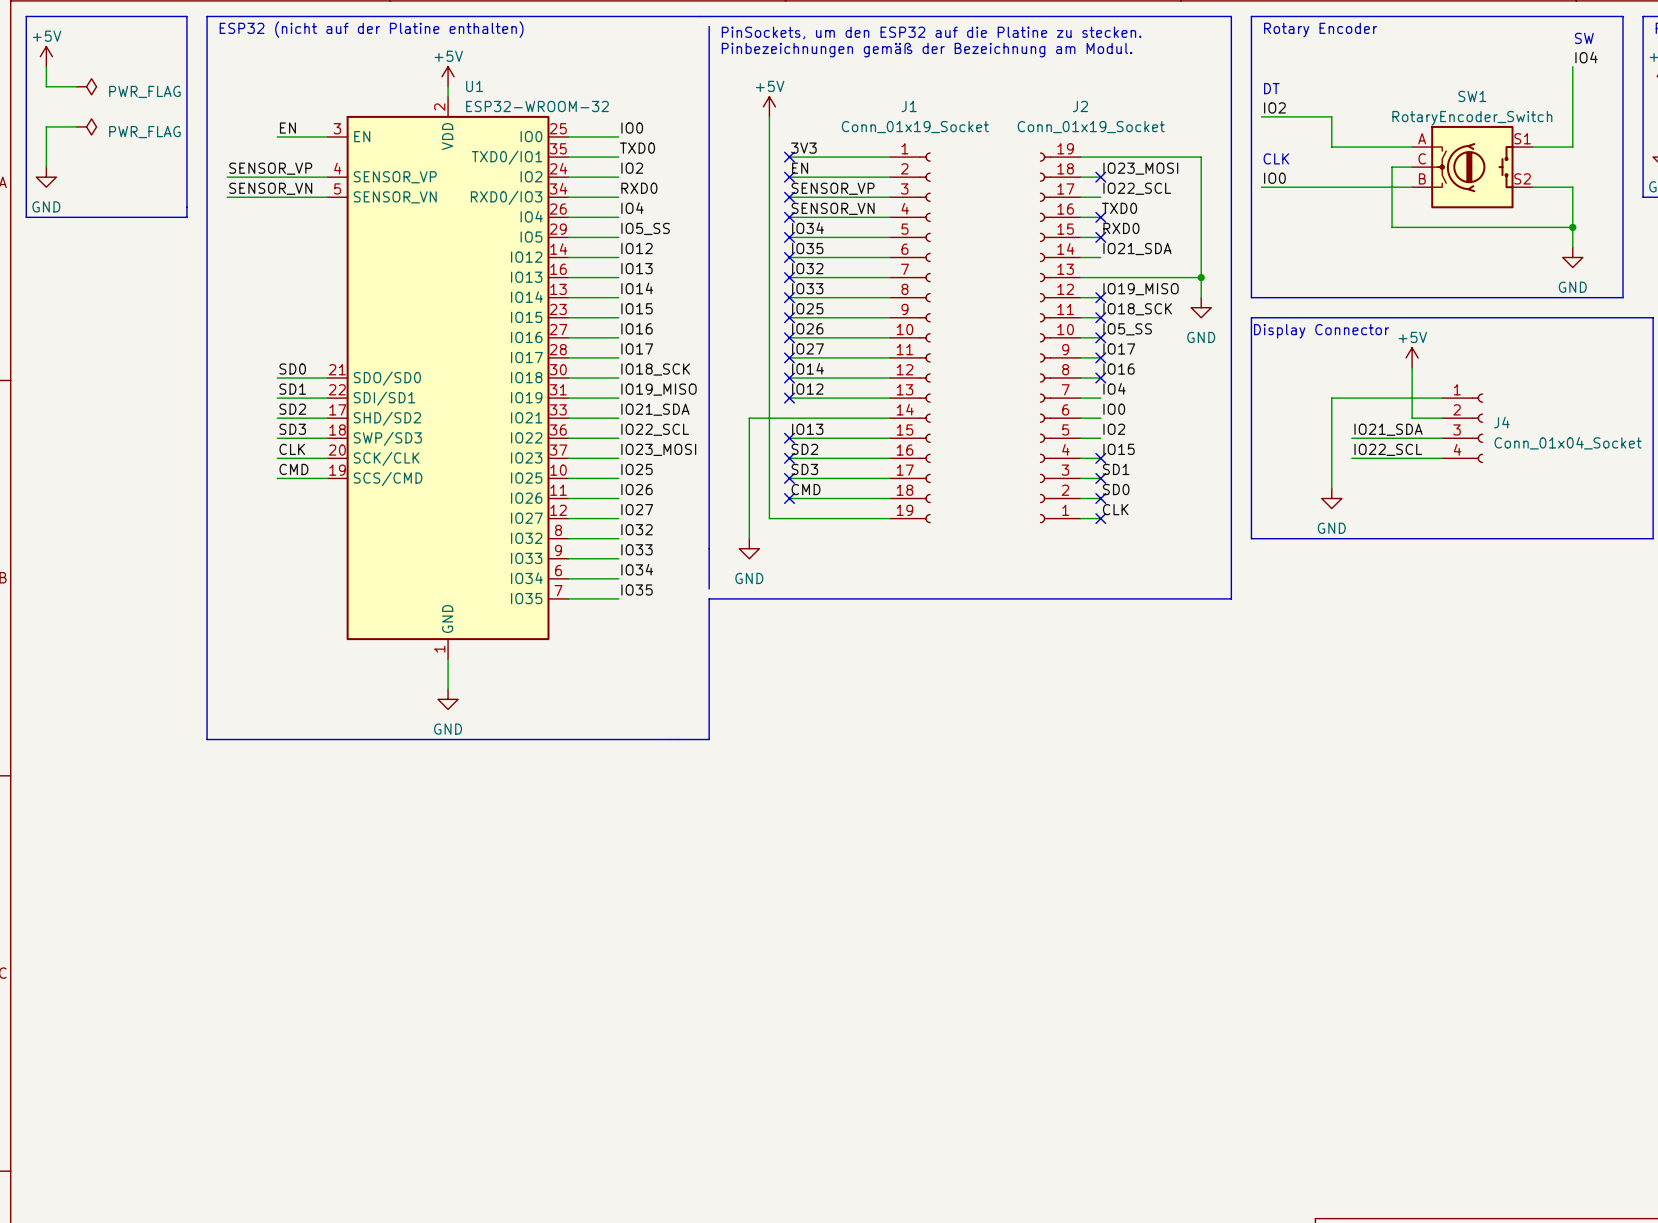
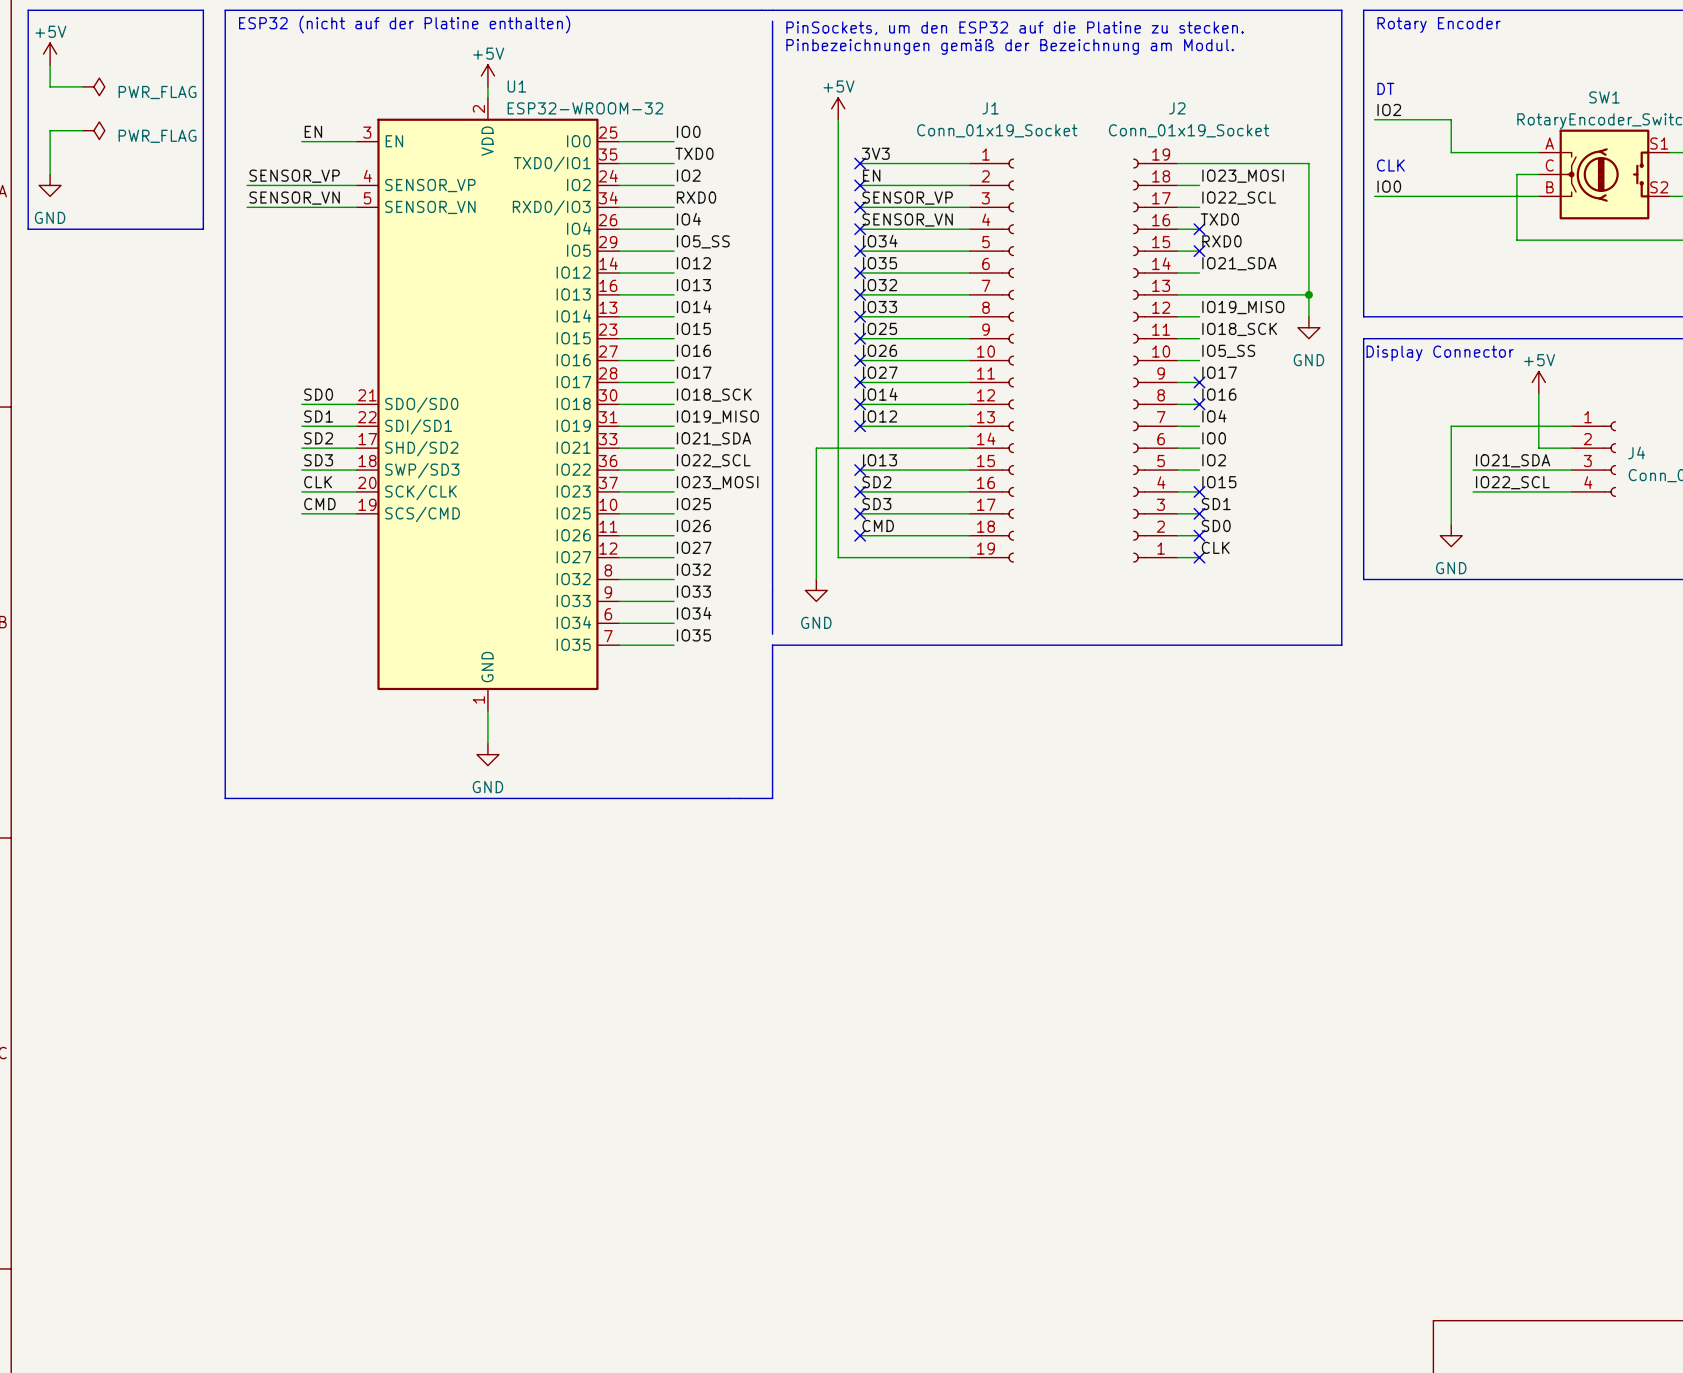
no-connect mark: (1100, 177) -> none
no-connect mark: (1100, 297) -> none
no-connect mark: (1100, 317) -> none
no-connect mark: (1100, 337) -> none

